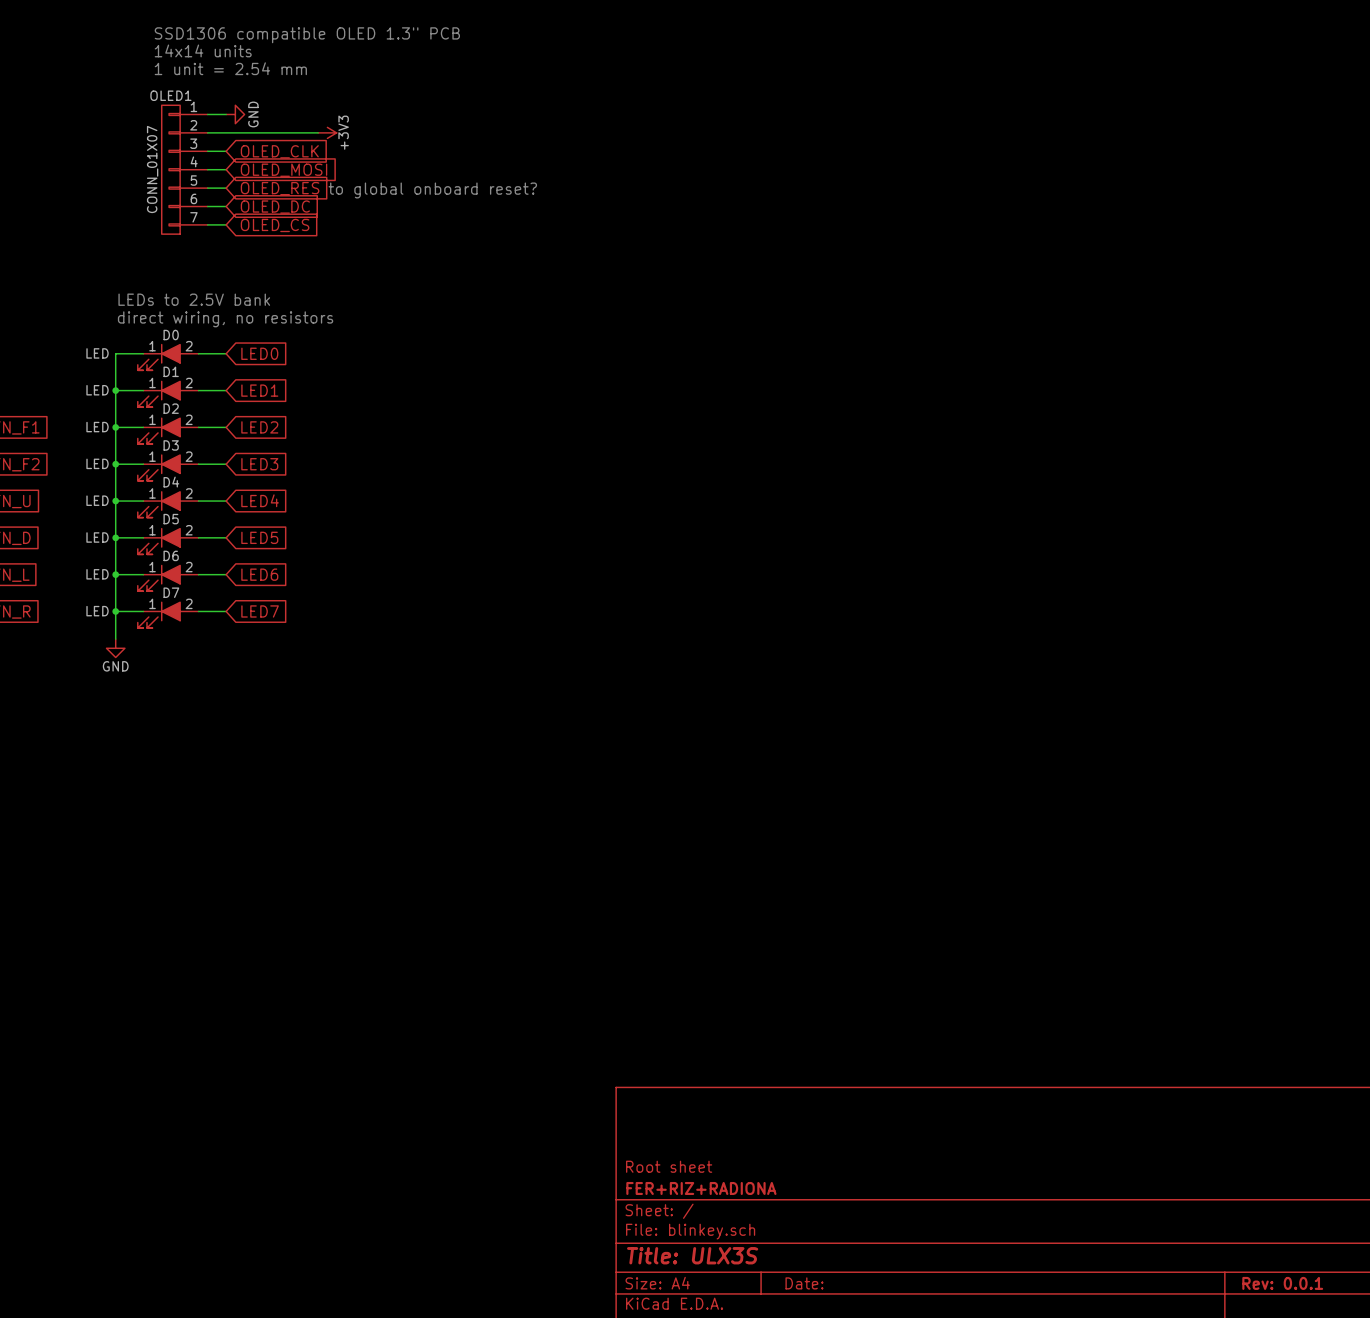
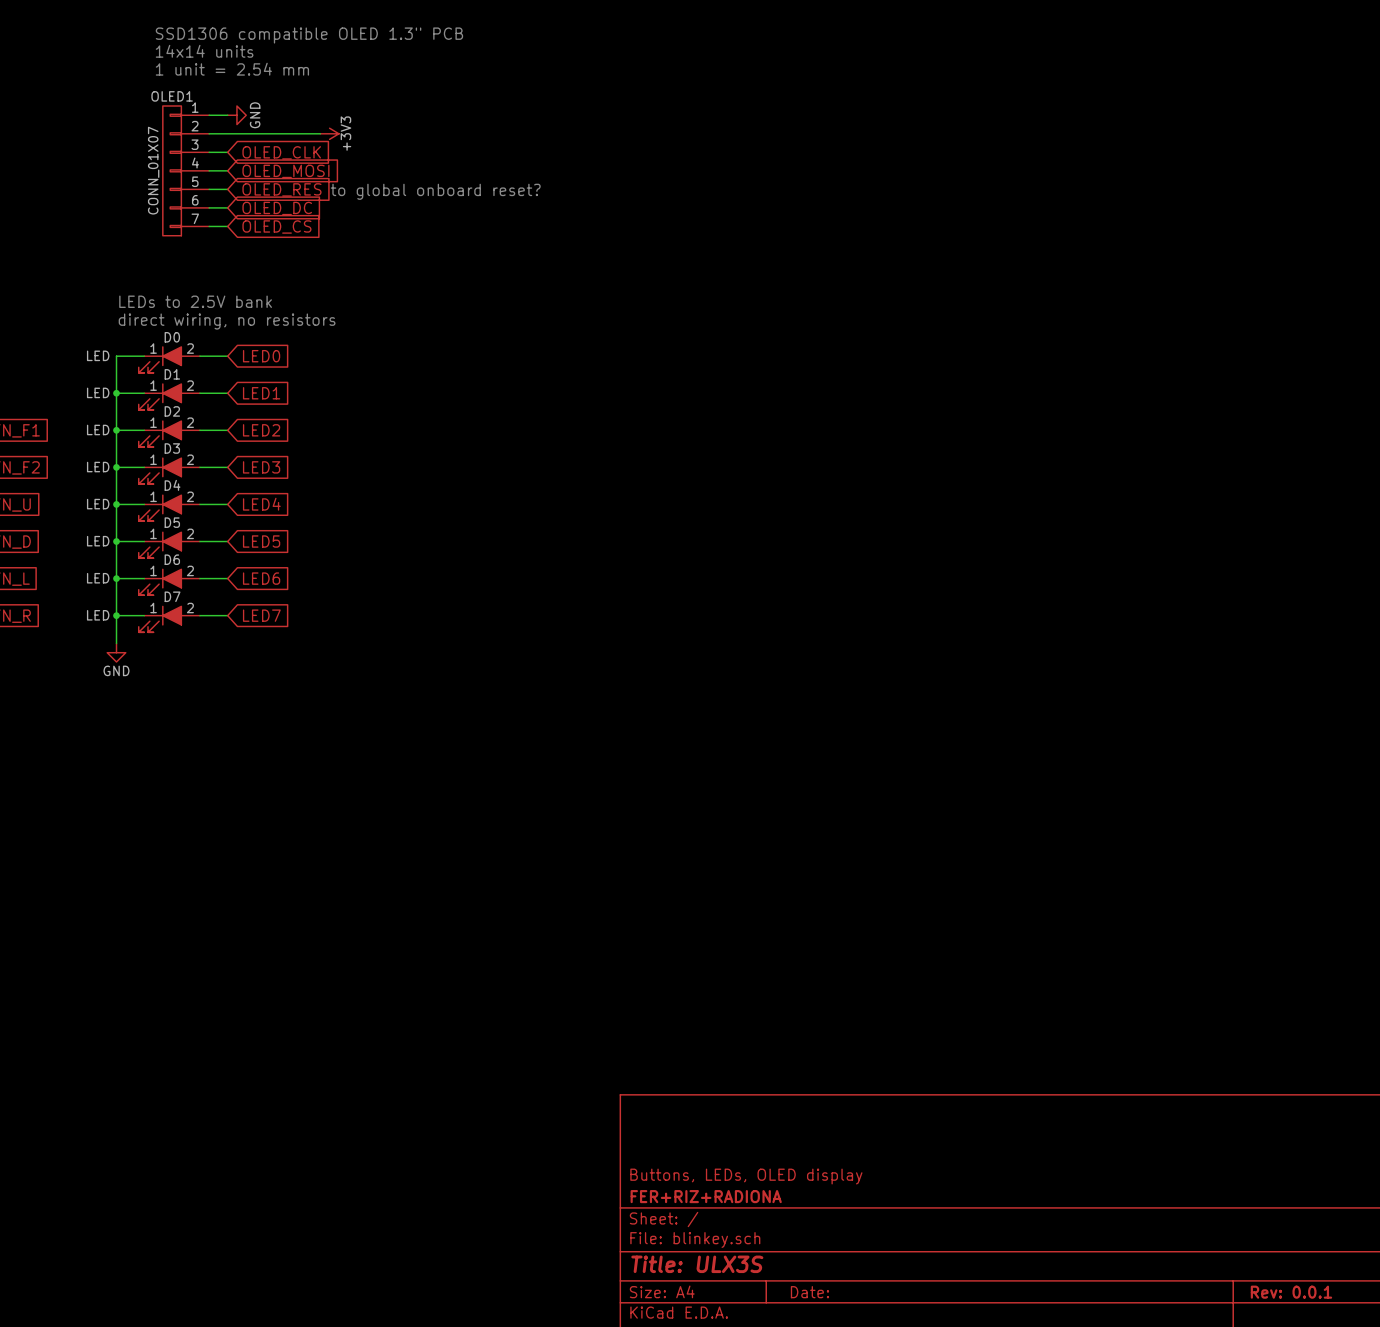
title block: Root sheet (669, 1166) -> Buttons, LEDs, OLED display (746, 1176)

